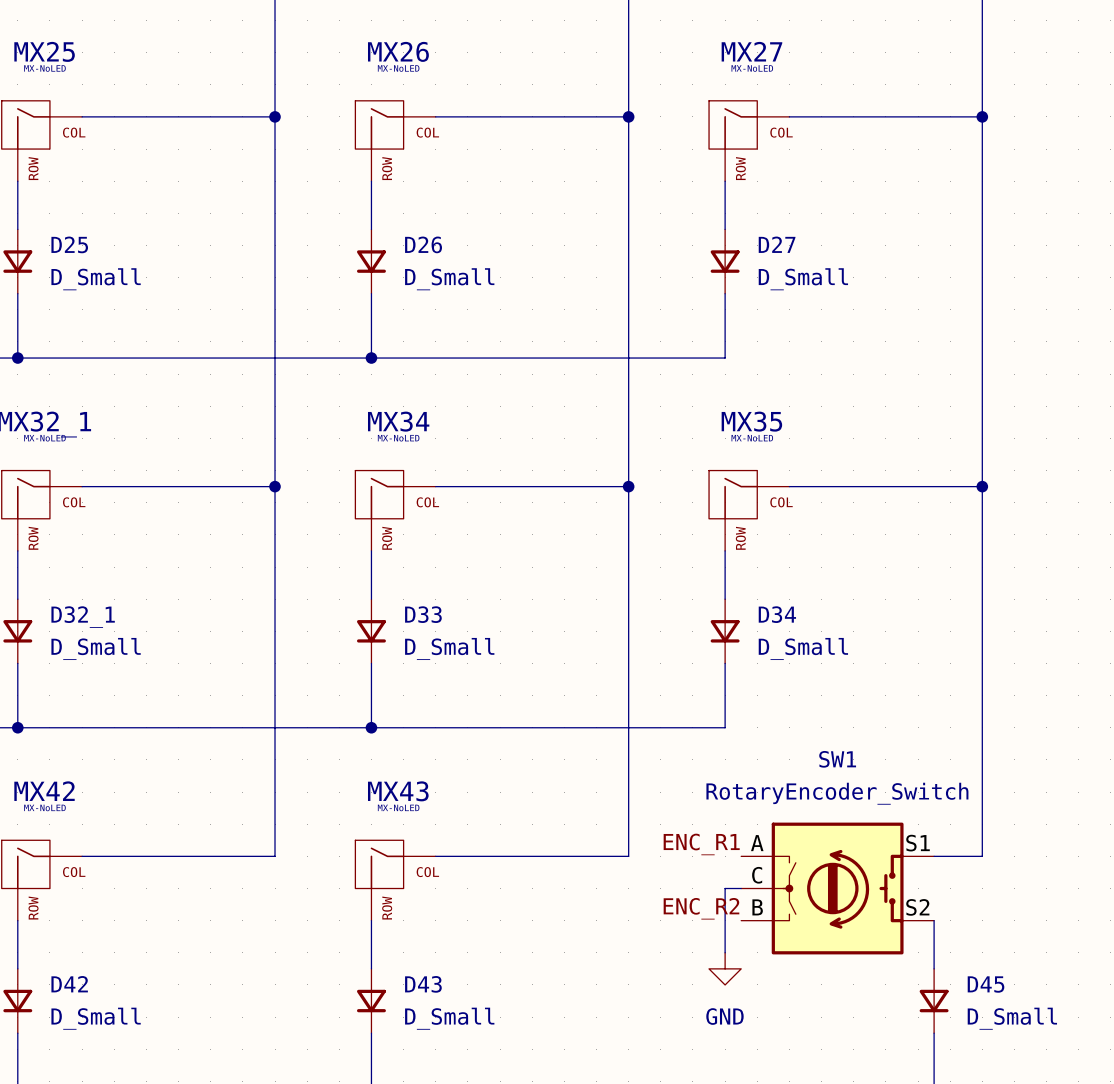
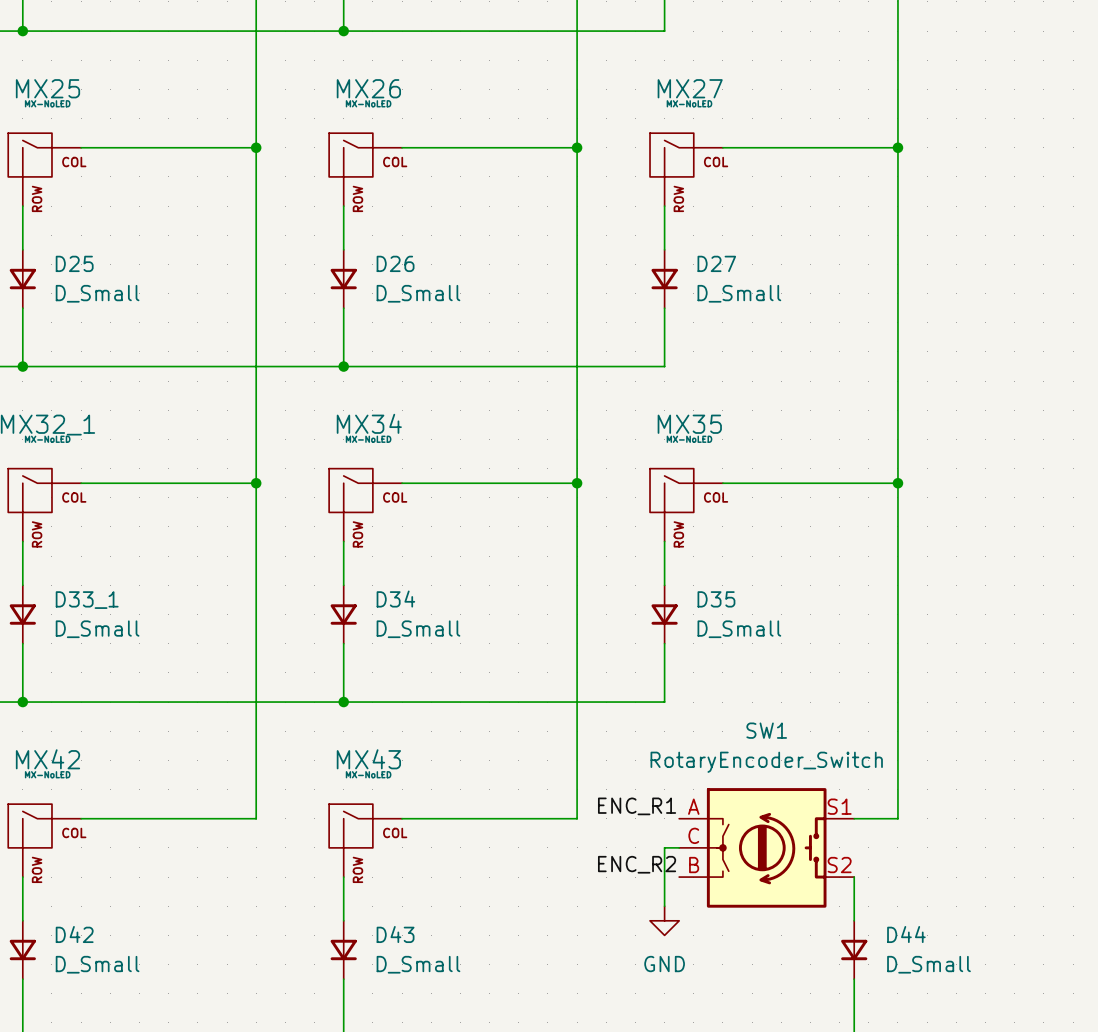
D33 name: D33 (423, 614) -> D34 (395, 599)
D34 name: D34 (777, 614) -> D35 (716, 599)
D32_1 name: D32_1 (83, 617) -> D33_1 (87, 600)
D45 name: D45 (986, 984) -> D44 (906, 934)

